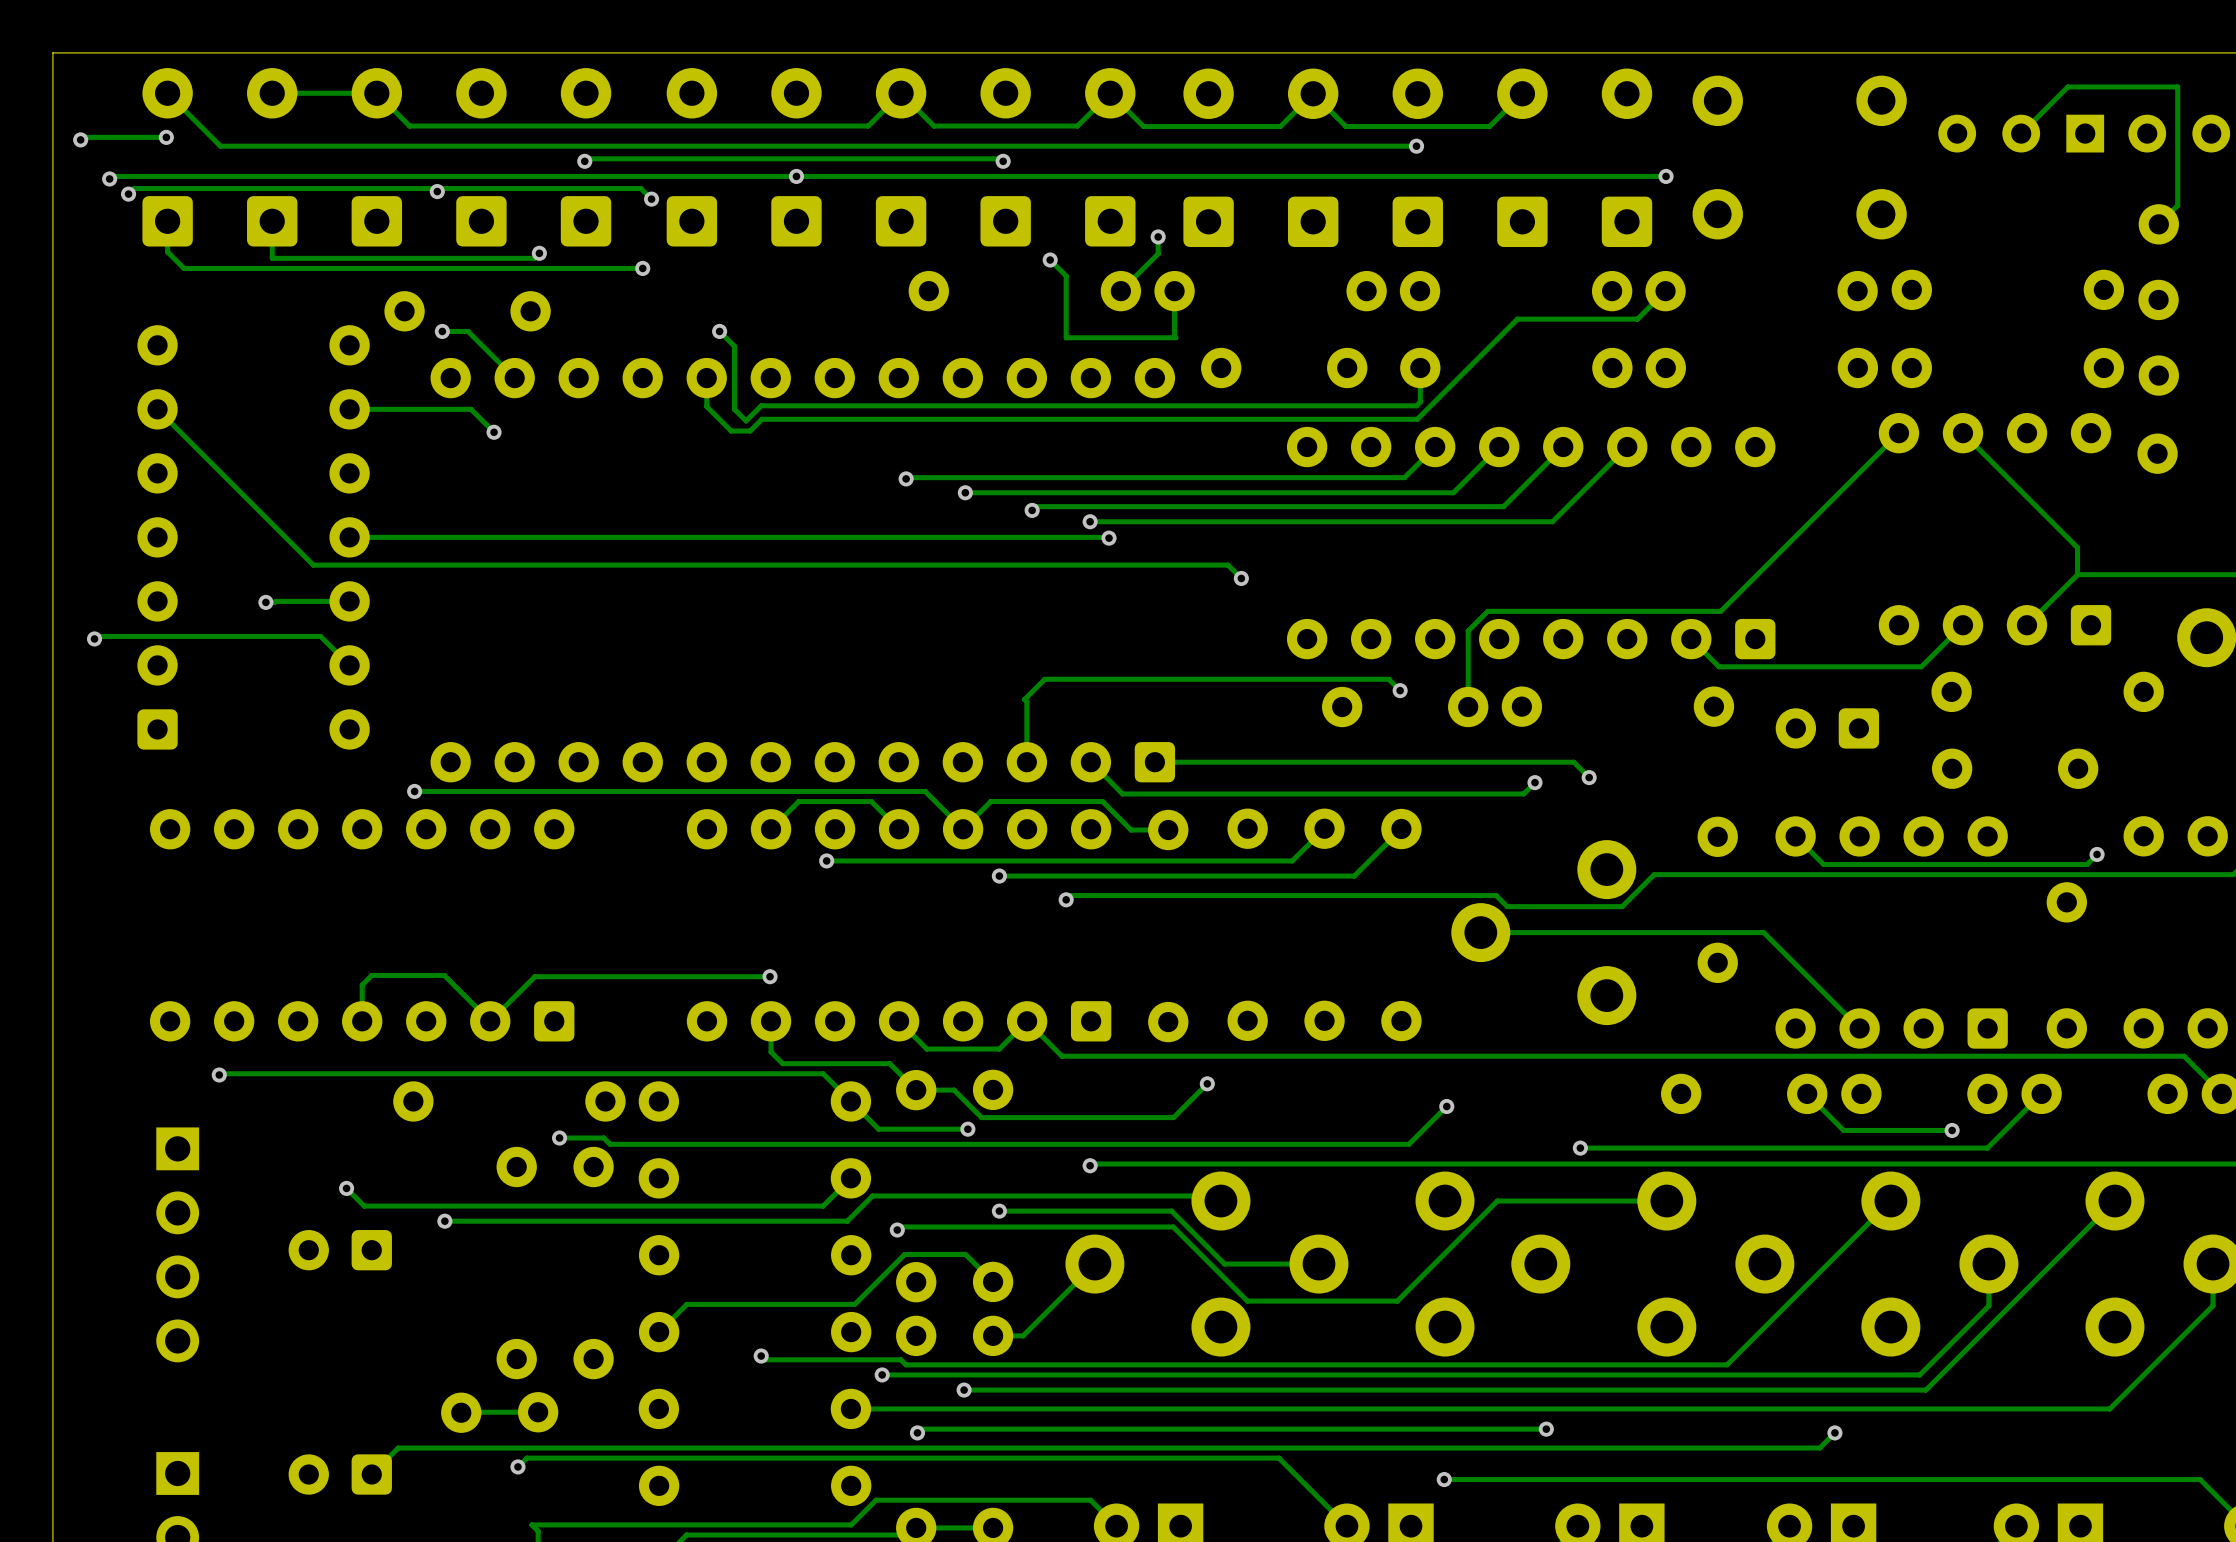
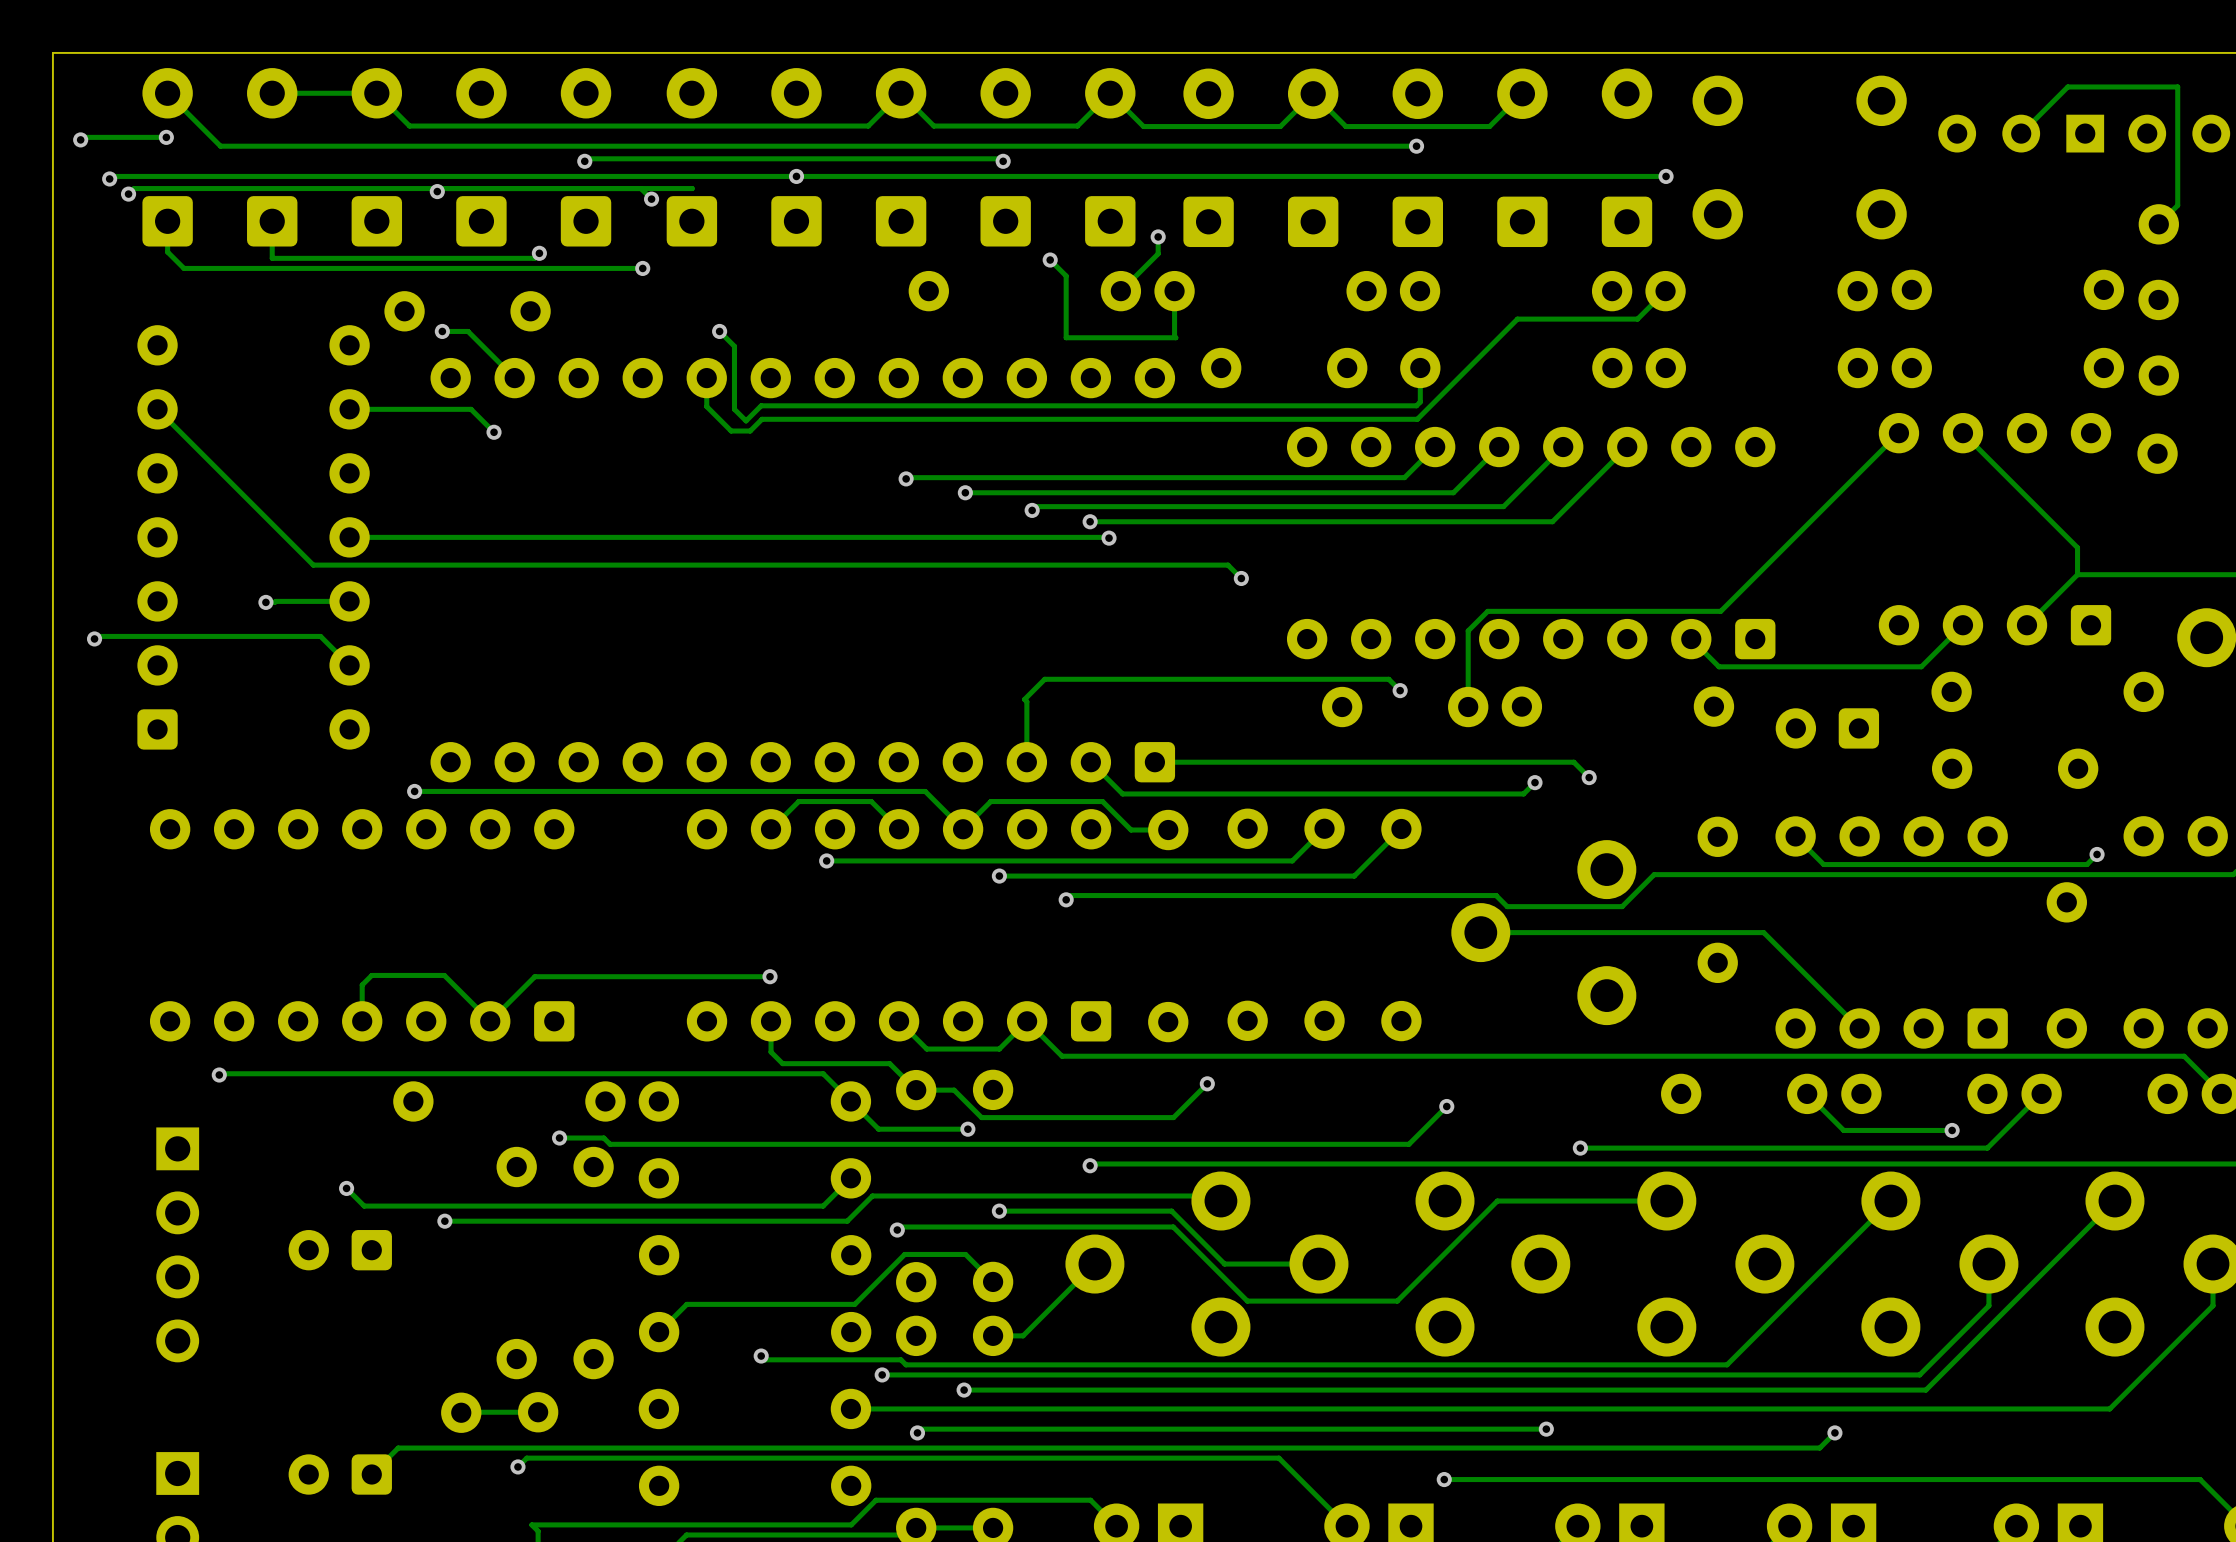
track: none -> (692, 188) (640, 188)

